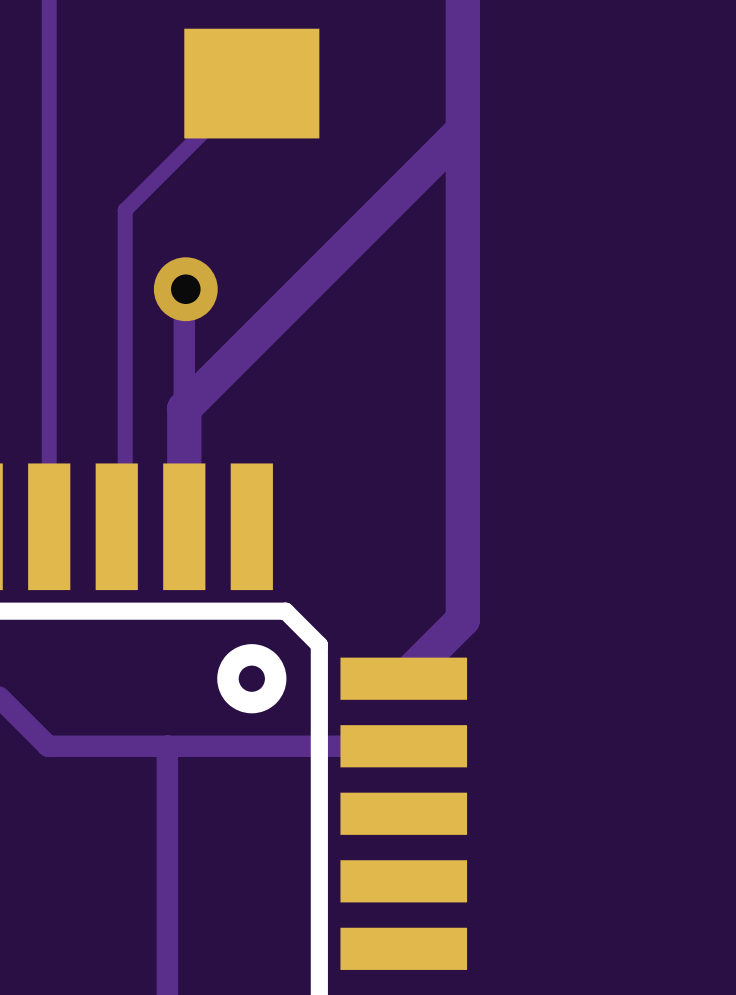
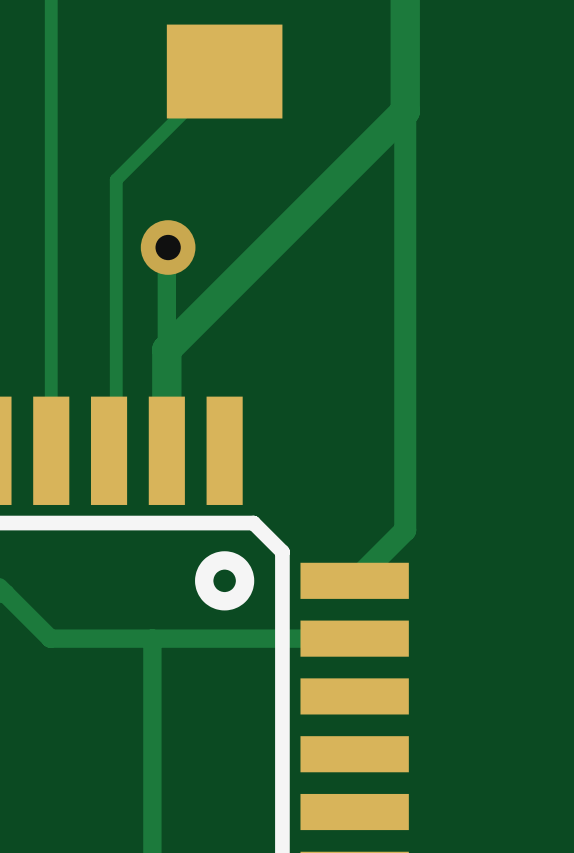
track width: thick (462, 130) (462, 619) (403, 678) -> thin (405, 111) (405, 530) (354, 580)

